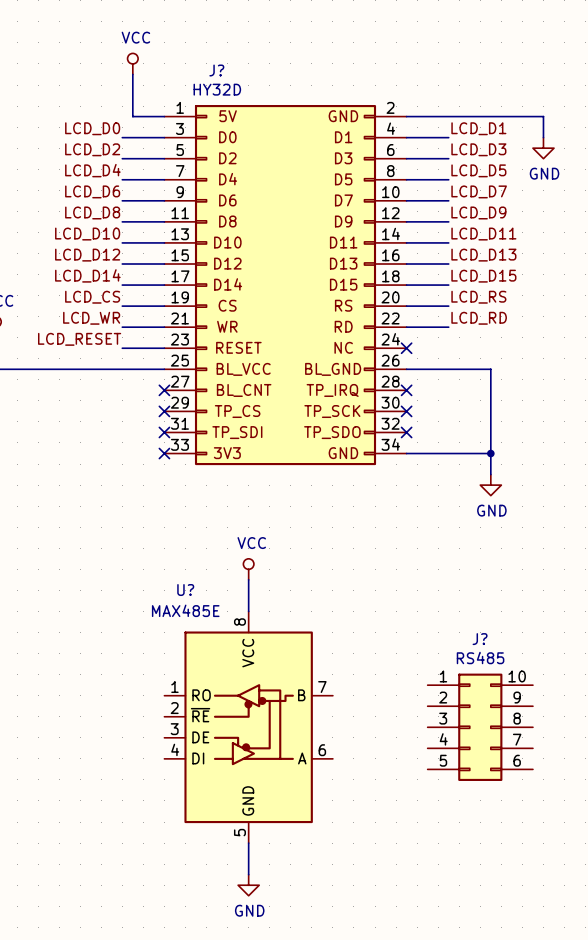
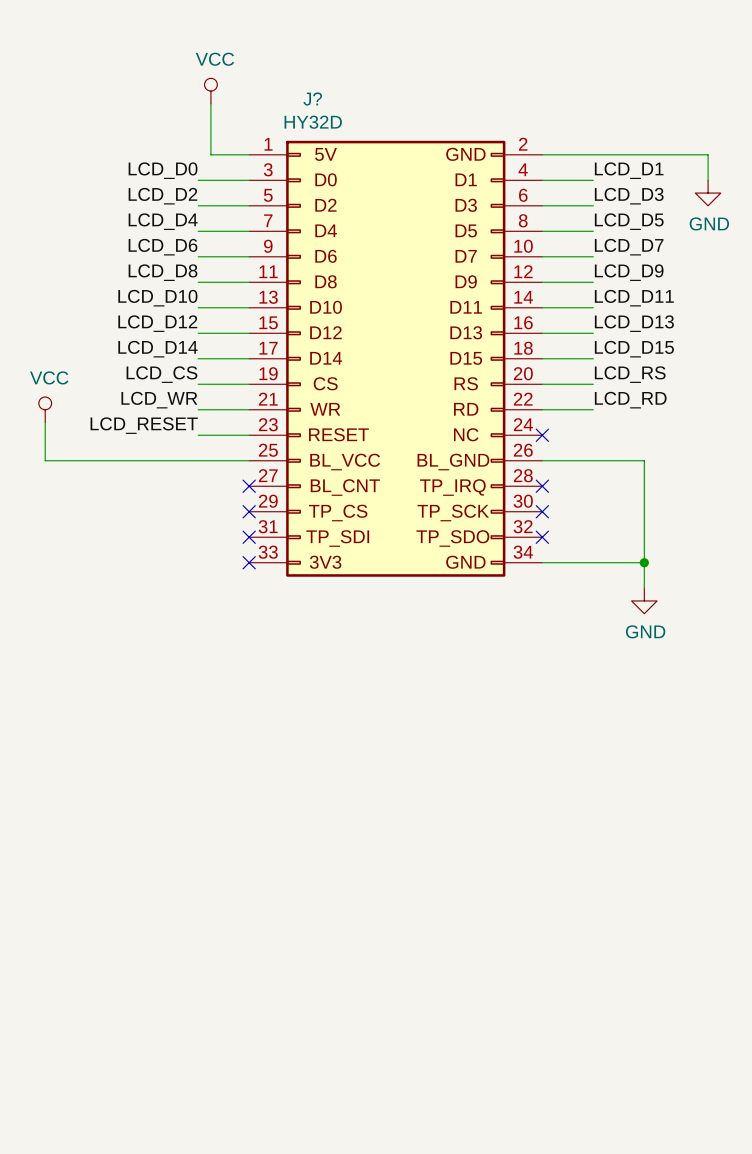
power symbol: VCC (248, 569) -> none
wire: (248, 579) (248, 611) -> none
U?: MAX485E (248, 727) -> none
J?: RS485 (480, 727) -> none
wire: (248, 843) (248, 874) -> none
power symbol: GND (248, 885) -> none

